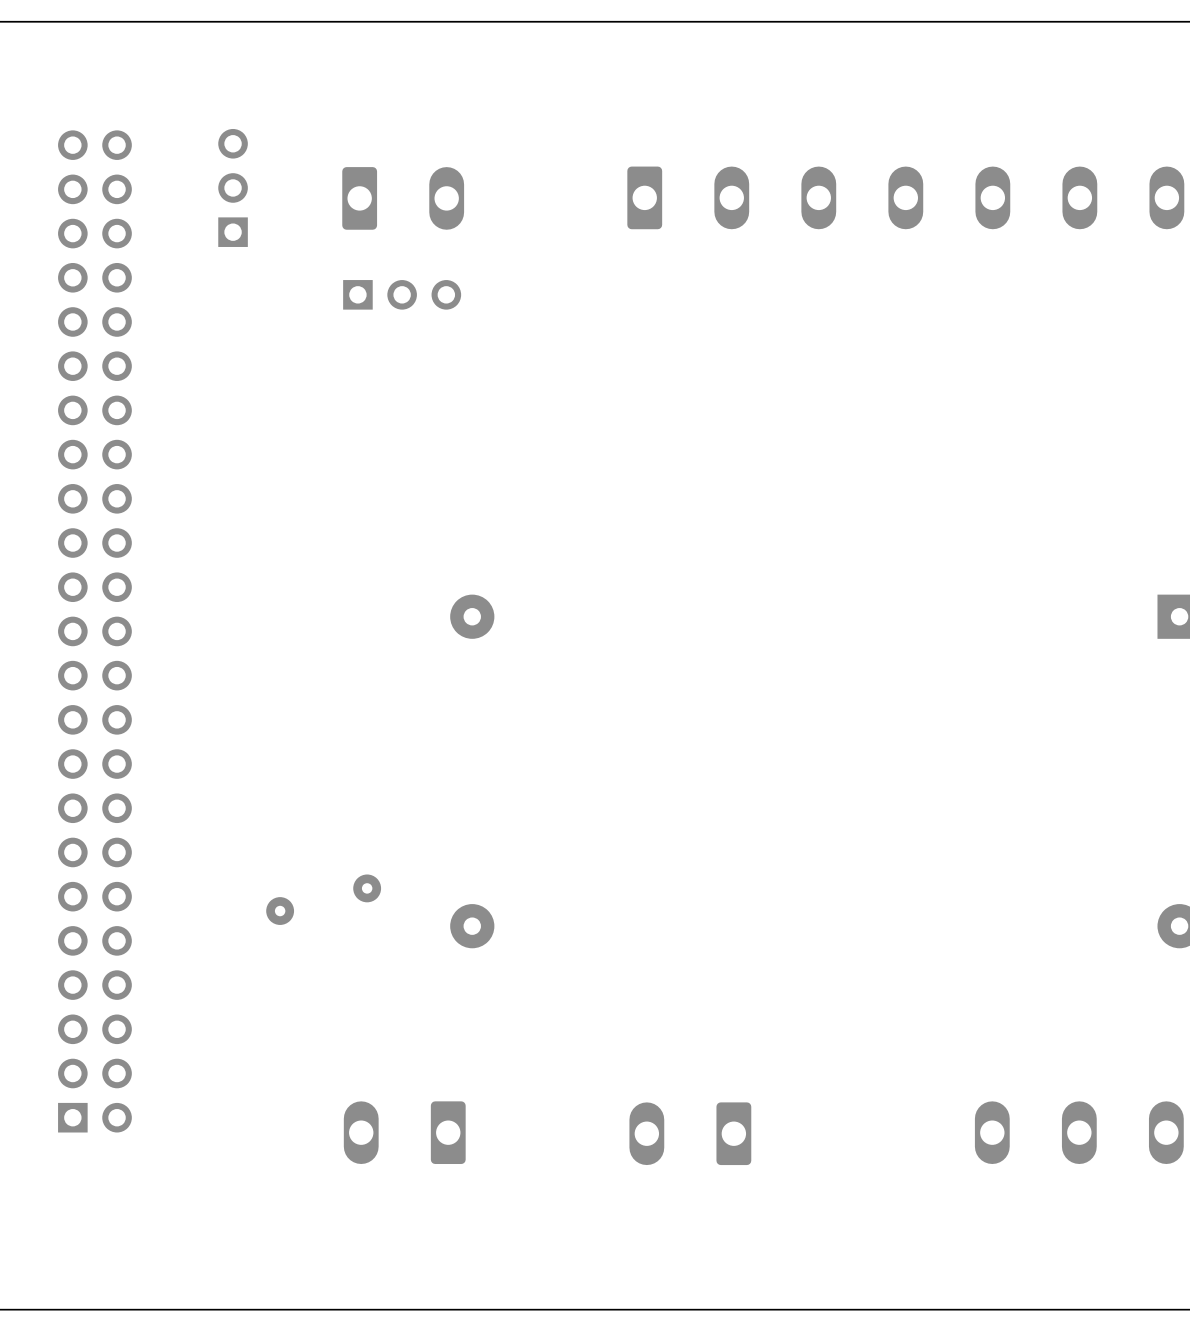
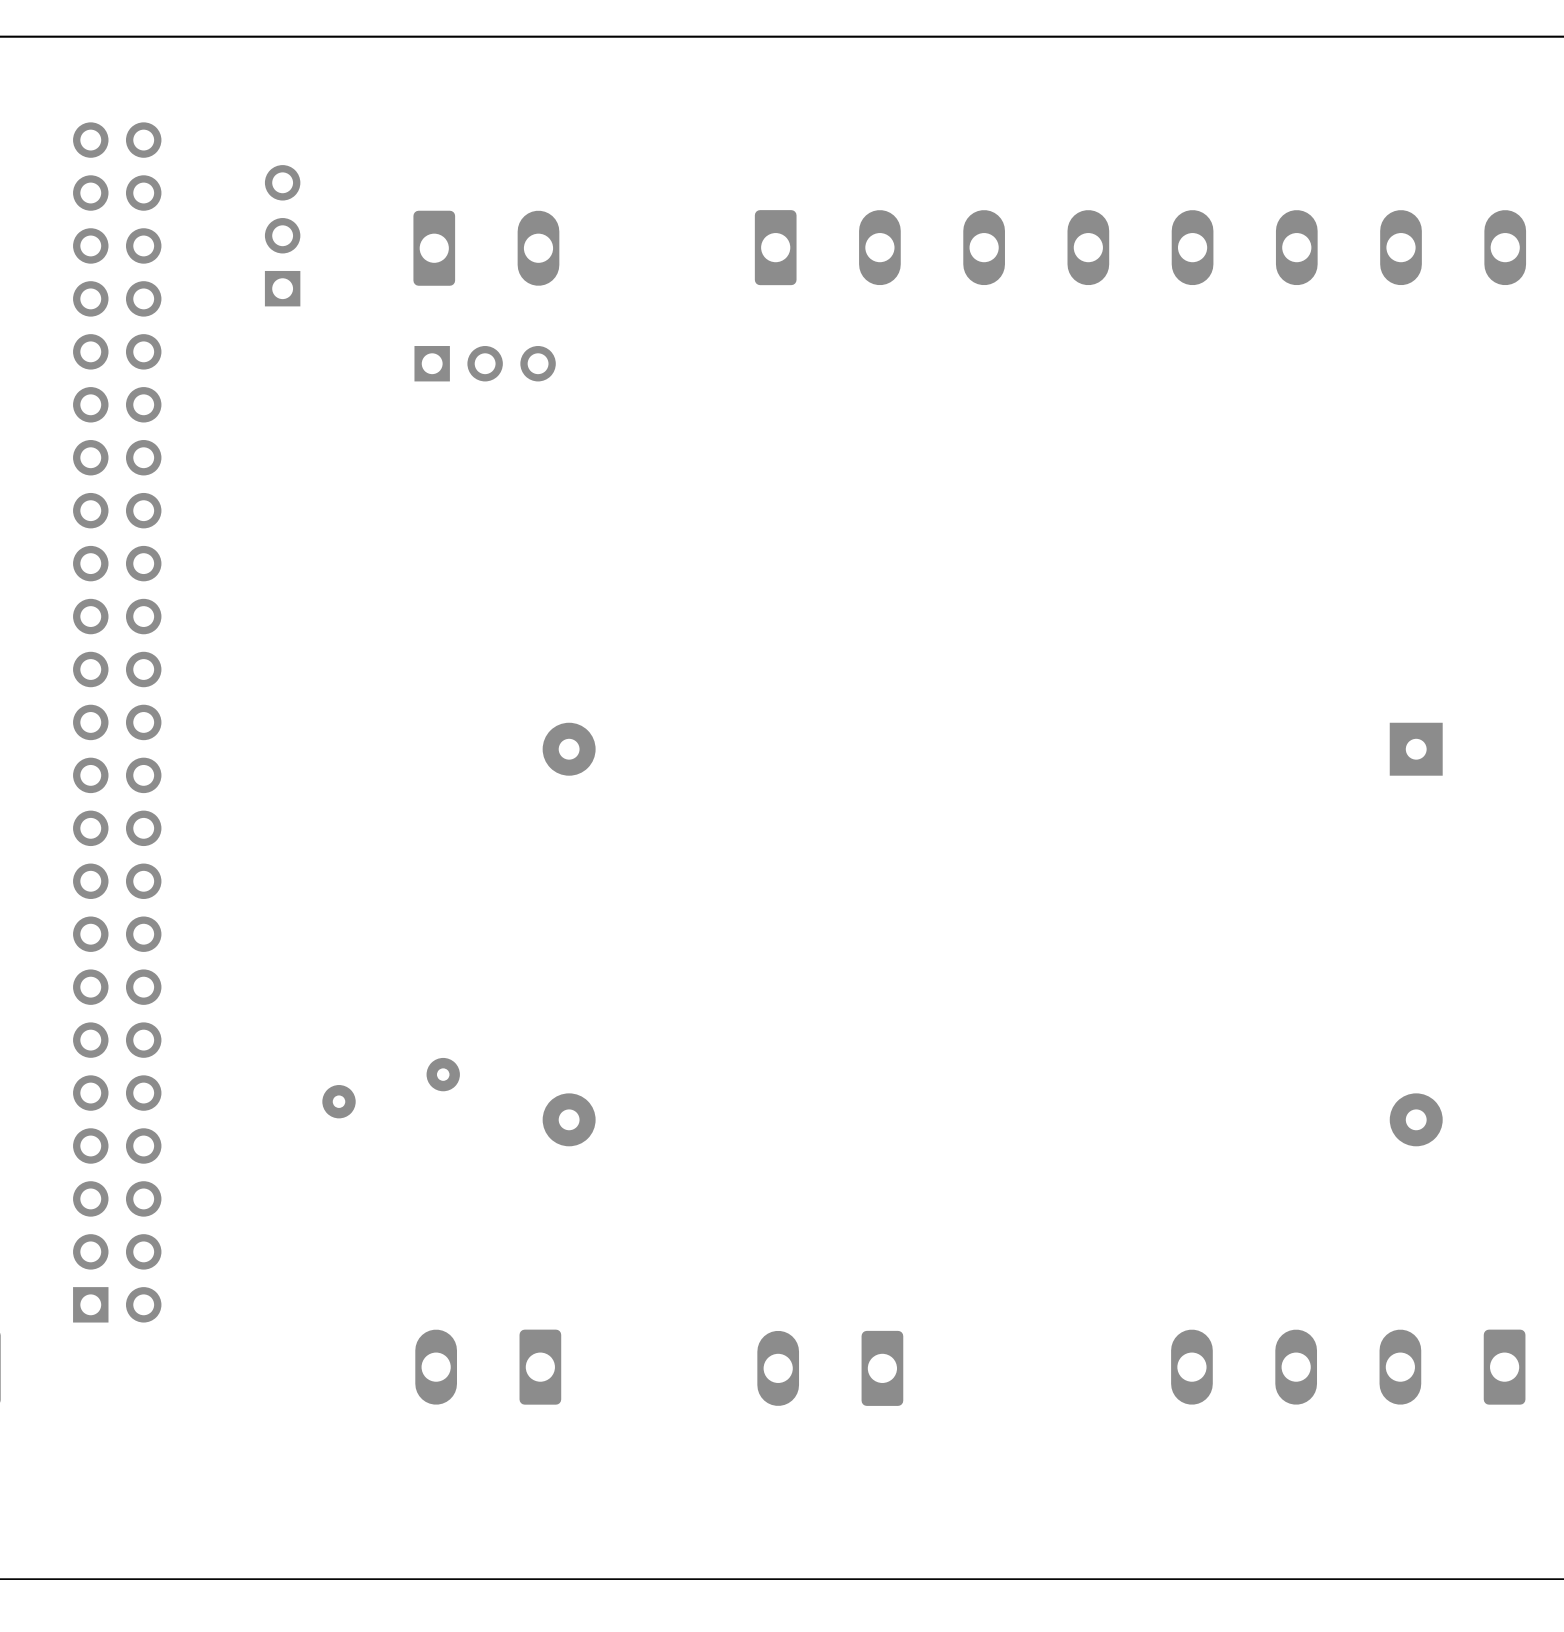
part position: (94, 631) -> (117, 722)

